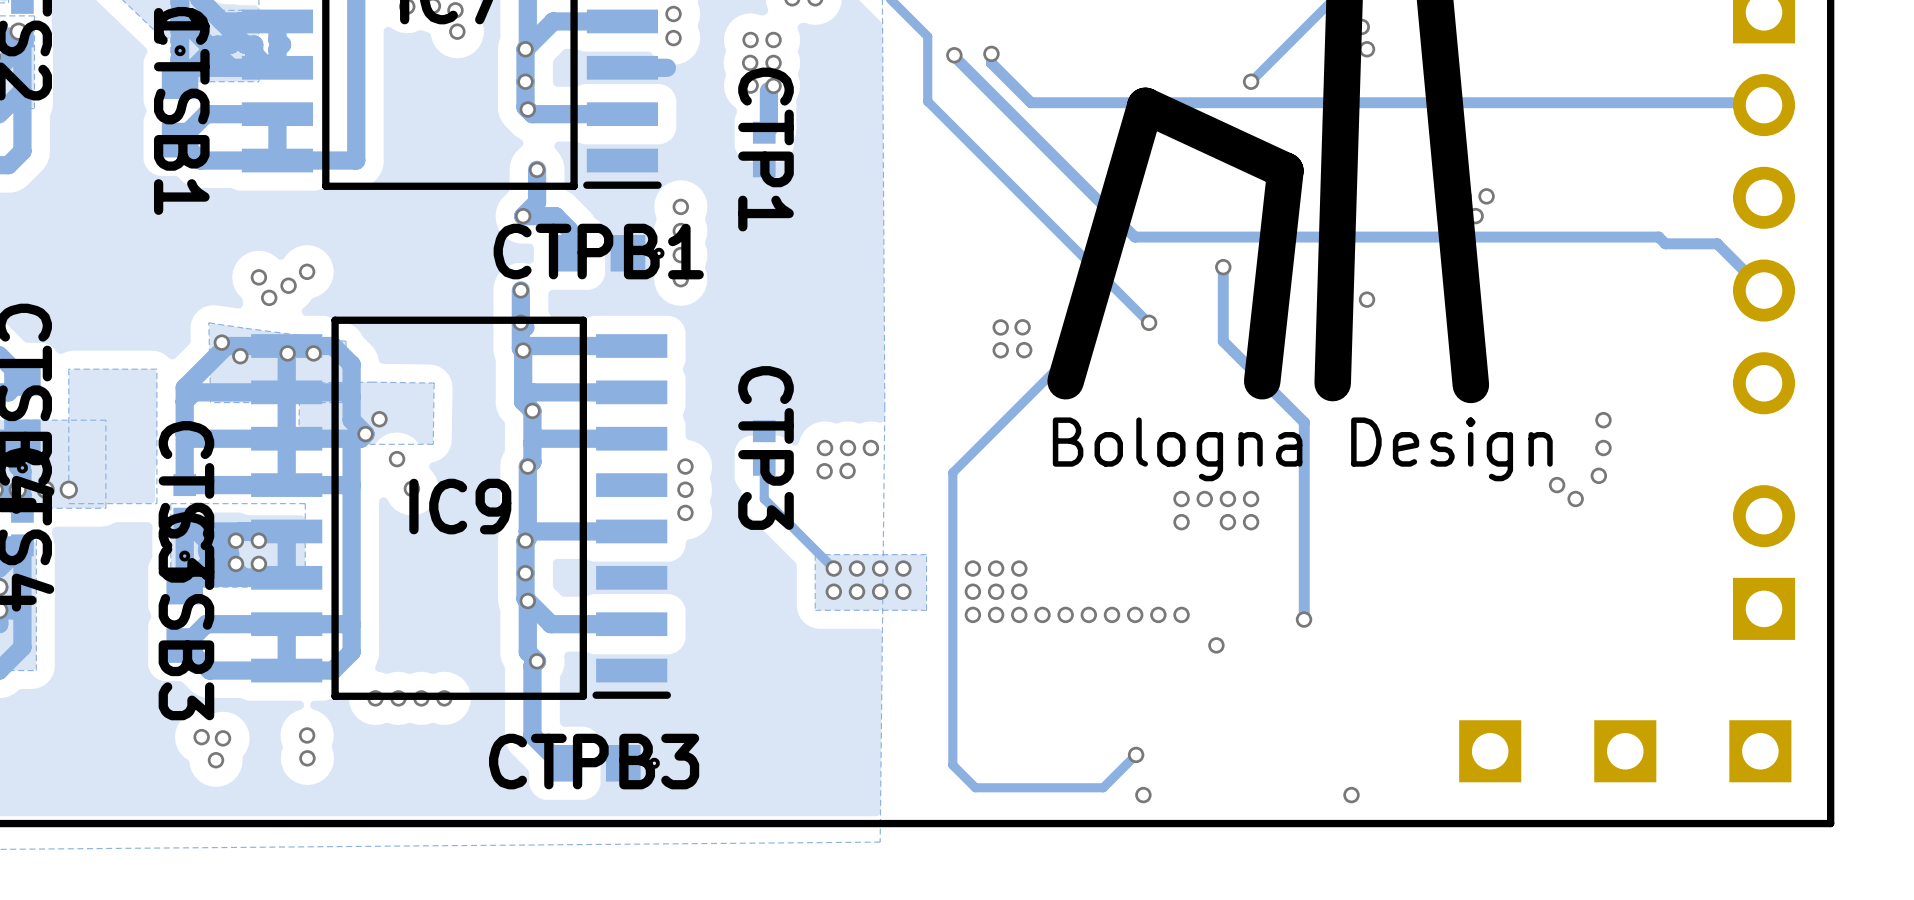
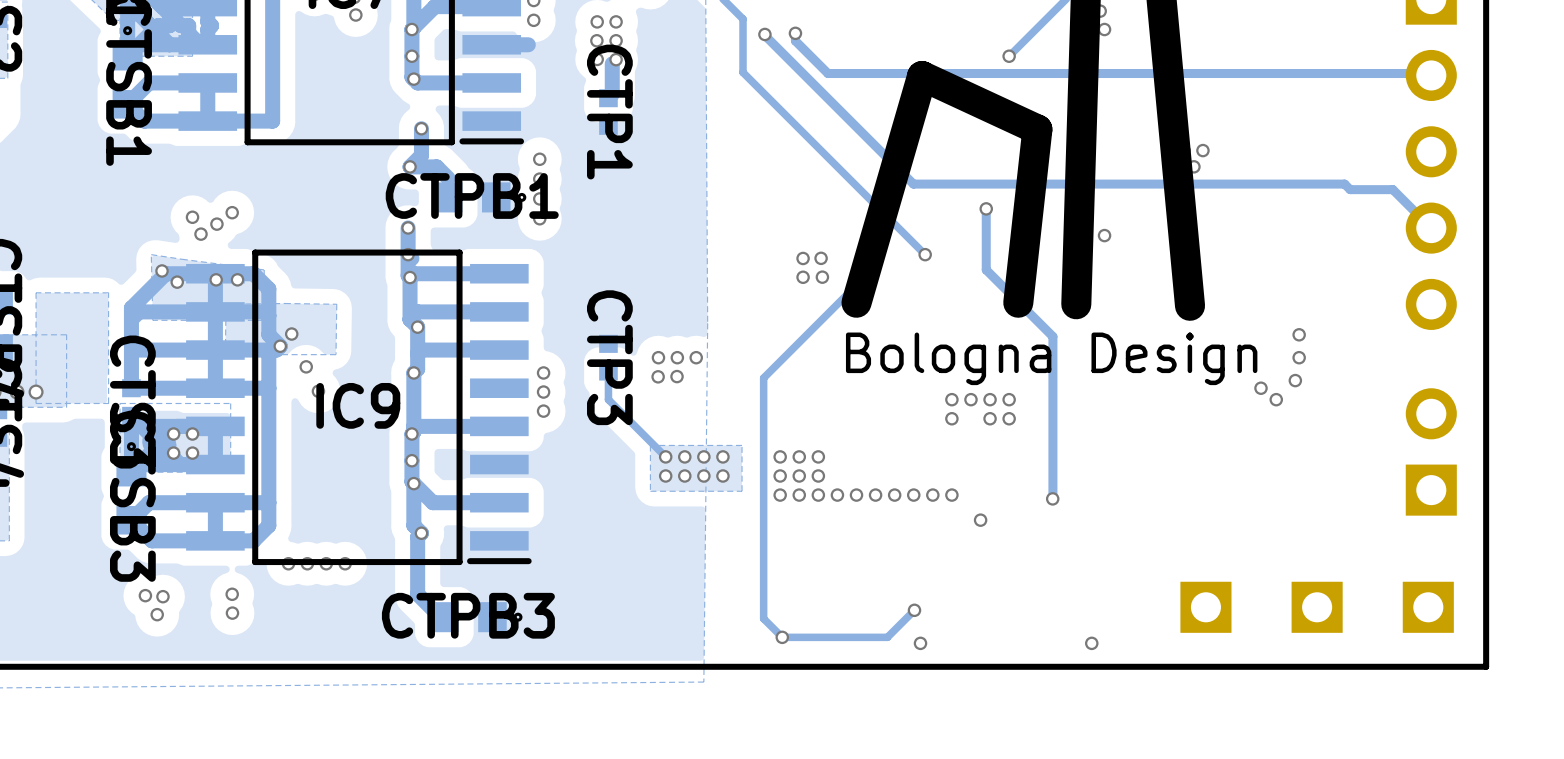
via: none -> (782, 637)

